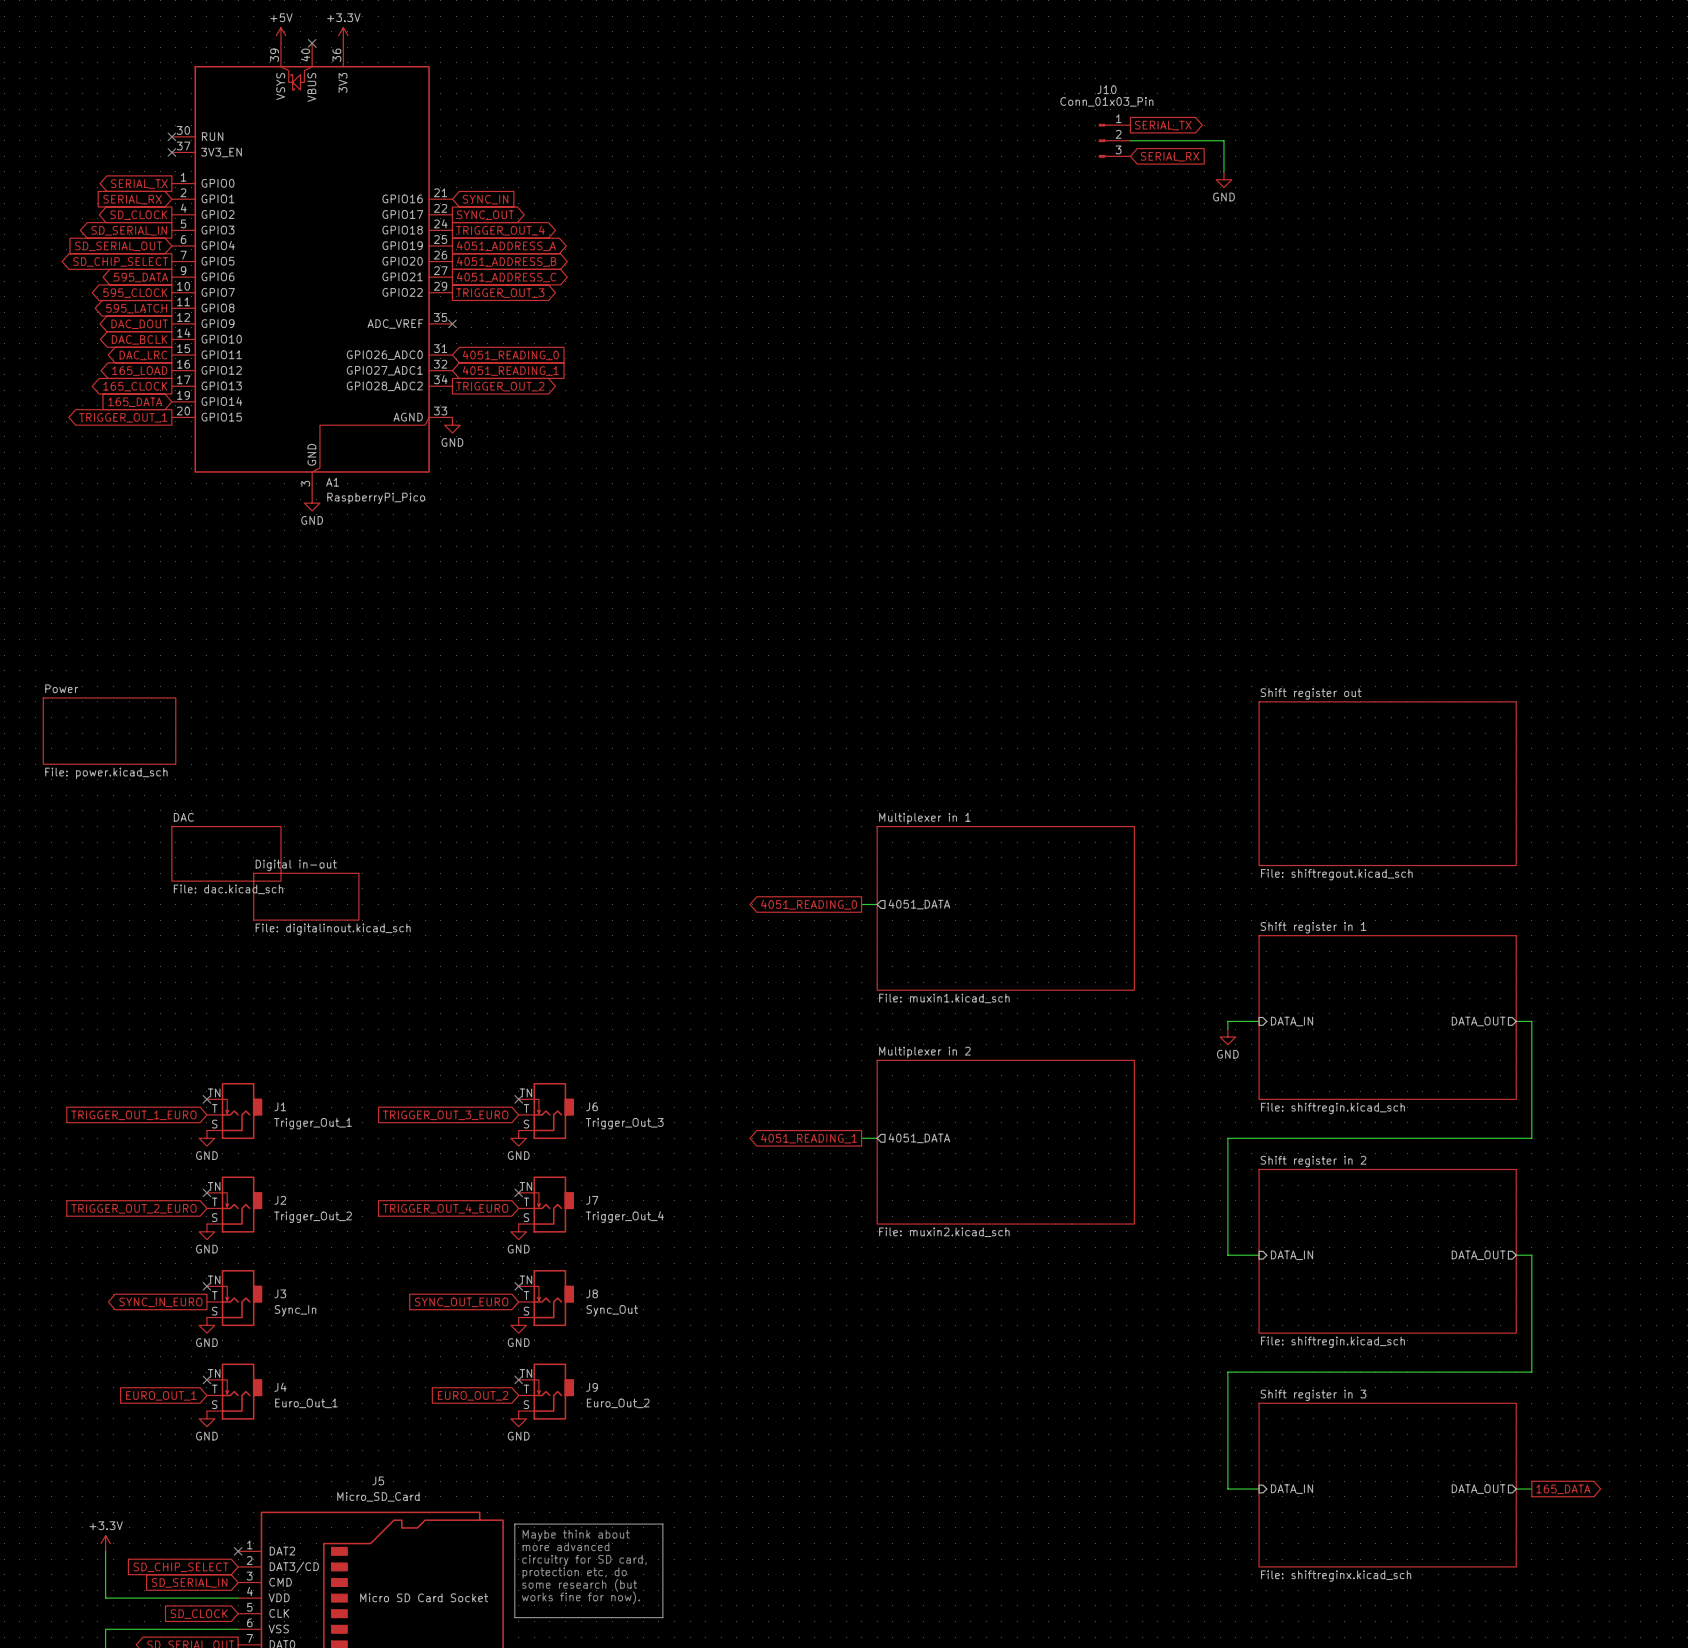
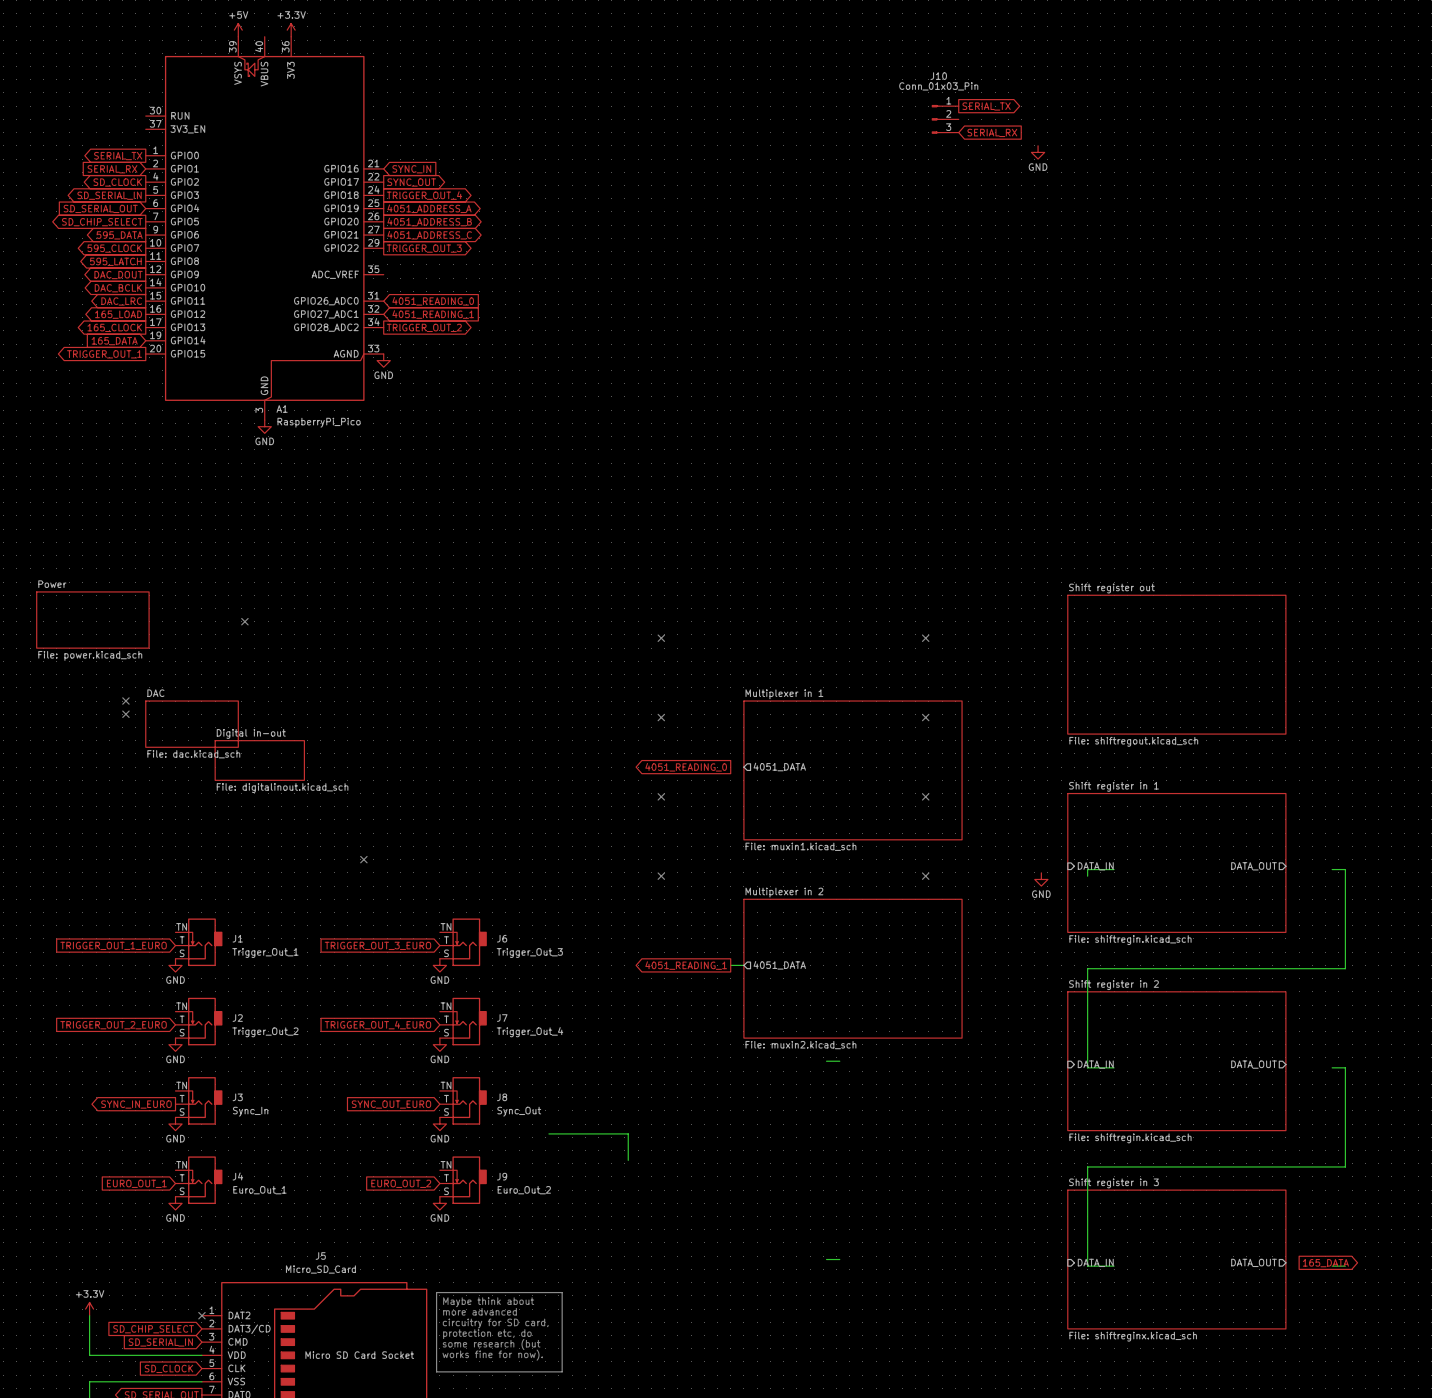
no-connect mark: (312, 43) -> none
no-connect mark: (171, 136) -> none
wire: (1130, 140) (1223, 140) (1223, 171) -> none
no-connect mark: (171, 152) -> none
no-connect mark: (452, 323) -> none
no-connect mark: none -> (244, 621)
no-connect mark: none -> (661, 638)
no-connect mark: none -> (925, 638)
no-connect mark: none -> (125, 701)
no-connect mark: none -> (125, 714)
no-connect mark: none -> (661, 717)
no-connect mark: none -> (925, 717)
wire: (861, 904) (877, 904) -> none
no-connect mark: none -> (661, 796)
no-connect mark: none -> (925, 796)
no-connect mark: none -> (363, 859)
wire: (1259, 1021) (1227, 1021) (1227, 1029) -> (1114, 869) (1087, 869) (1087, 876)
wire: (1516, 1021) (1531, 1021) (1531, 1138) (1227, 1138) (1227, 1255) (1259, 1255) -> (1332, 869) (1345, 869) (1345, 968) (1087, 968) (1087, 1067) (1114, 1067)
no-connect mark: none -> (661, 876)
no-connect mark: none -> (925, 876)
no-connect mark: (206, 1099) -> none
no-connect mark: (518, 1099) -> none
no-connect mark: (206, 1192) -> none
no-connect mark: (518, 1192) -> none
wire: none -> (826, 1061) (839, 1061)
wire: (1516, 1255) (1531, 1255) (1531, 1372) (1227, 1372) (1227, 1489) (1259, 1489) -> (1332, 1067) (1345, 1067) (1345, 1166) (1087, 1166) (1087, 1266) (1114, 1266)
no-connect mark: (206, 1286) -> none
no-connect mark: (518, 1286) -> none
wire: none -> (548, 1133) (628, 1133) (628, 1160)
no-connect mark: (206, 1379) -> none
no-connect mark: (518, 1379) -> none
wire: none -> (826, 1259) (839, 1259)
wire: (1516, 1489) (1531, 1489) -> (1332, 1266) (1345, 1266)

